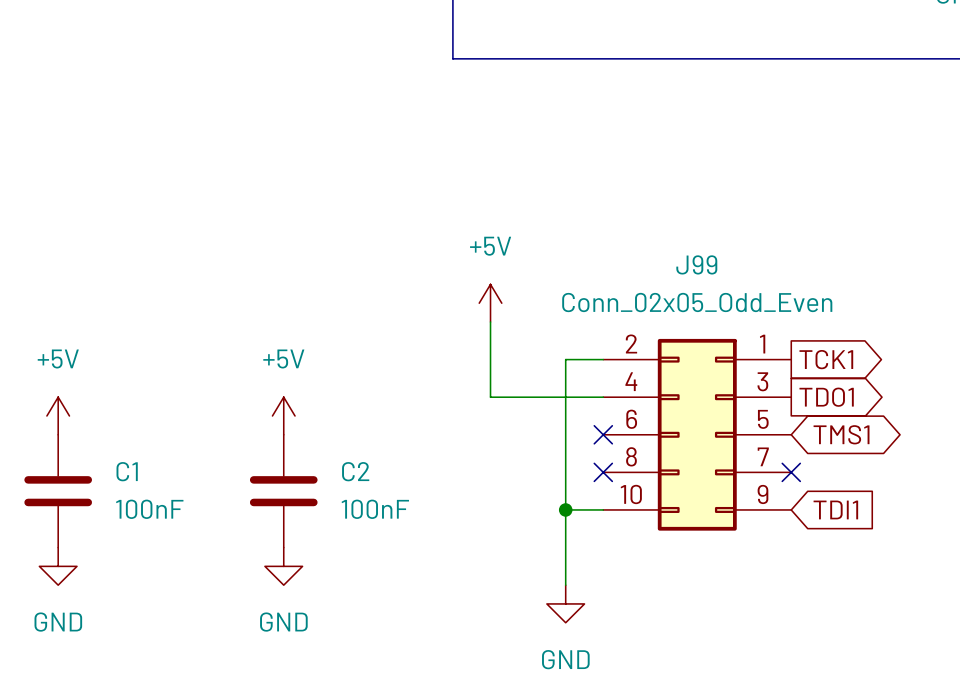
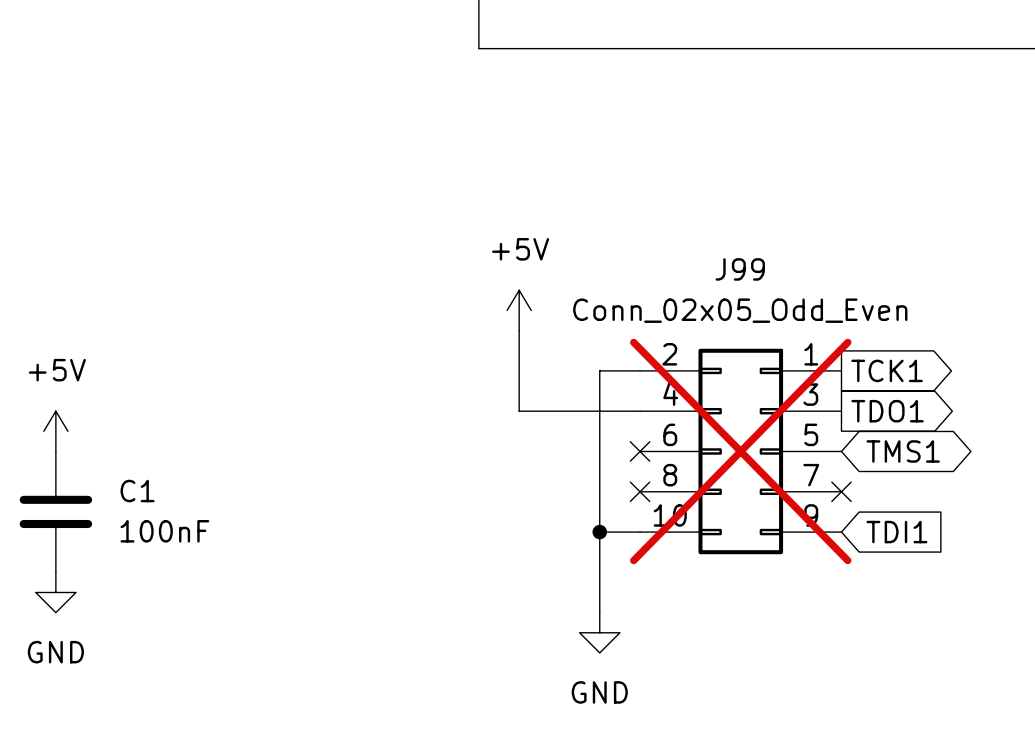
power symbol: +5V (283, 415) -> none
J99 do-not-place cross: none -> (740, 451)
C2: 100nF (283, 491) -> none
power symbol: GND (283, 566) -> none

